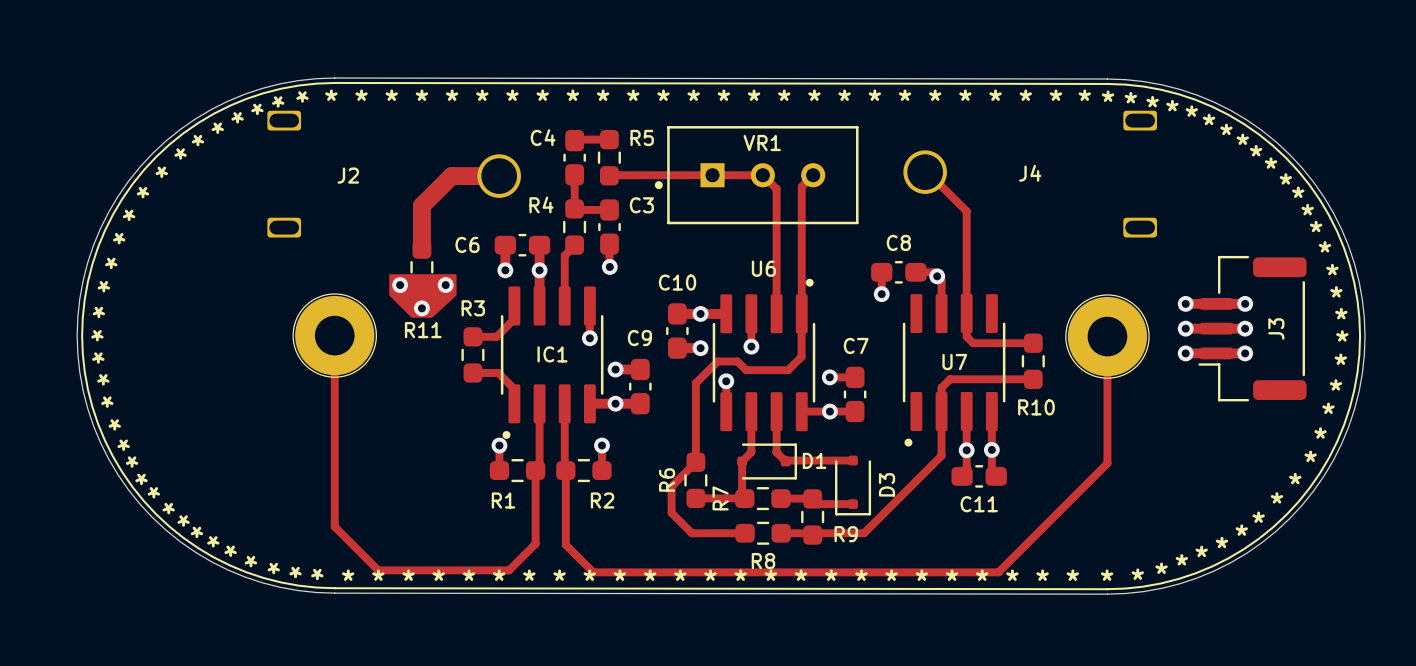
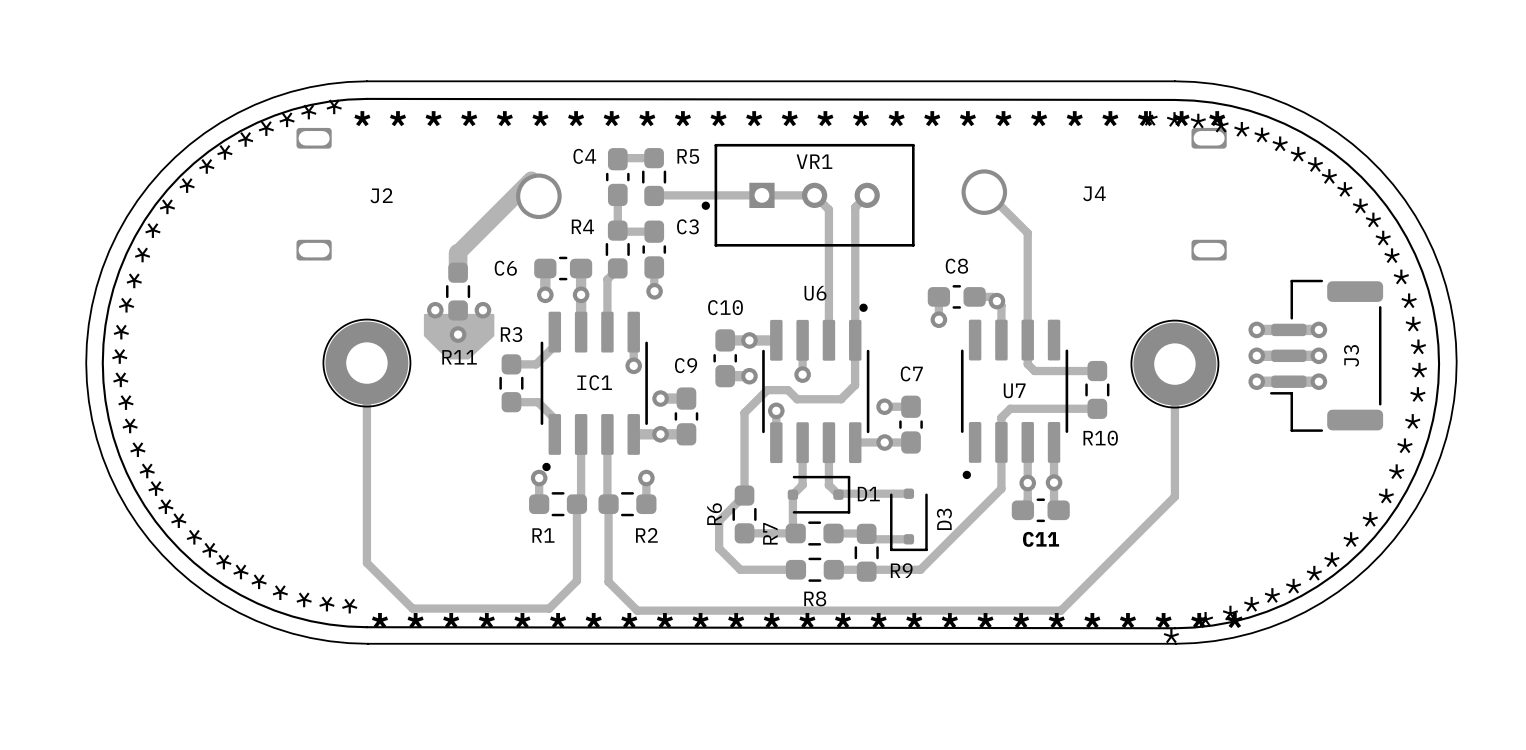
board edge: (334, 78) (1107, 79) (1162, 84) (1197, 95) (1246, 119) (1289, 154) (1324, 197) (1341, 229) (1359, 281) (1364, 318) (1362, 373) (1348, 426) (1324, 475) (1302, 505) (1276, 531) (1246, 553) (1214, 570) (1180, 583) (1144, 591) (1107, 594) (334, 593) (280, 587) (244, 576) (211, 561) (166, 530) (140, 504) (108, 459) (93, 425) (79, 372) (77, 335) (83, 280) (93, 245) (118, 196) (140, 166) (180, 129) (211, 109) (244, 94) (280, 83) (334, 78) -> (366, 81) (328, 83) (272, 97) (220, 122) (189, 144) (148, 185) (117, 233) (96, 287) (88, 324) (86, 382) (92, 420) (102, 457) (127, 509) (162, 554) (190, 581) (238, 612) (273, 627) (329, 641) (367, 643) (1175, 643) (1214, 641) (1251, 633) (1287, 620) (1322, 602) (1353, 580) (1381, 554) (1405, 524) (1425, 491) (1440, 456) (1454, 400) (1455, 342) (1450, 304) (1433, 250) (1404, 199) (1367, 156) (1321, 121) (1269, 97) (1213, 83) (1174, 81) (366, 81)
track: (499, 176) (451, 176) (421, 205) (421, 230) -> (531, 179) (458, 253)
drawing position: (422, 295) -> (459, 336)
text position: * (1107, 575) -> * (1171, 635)

